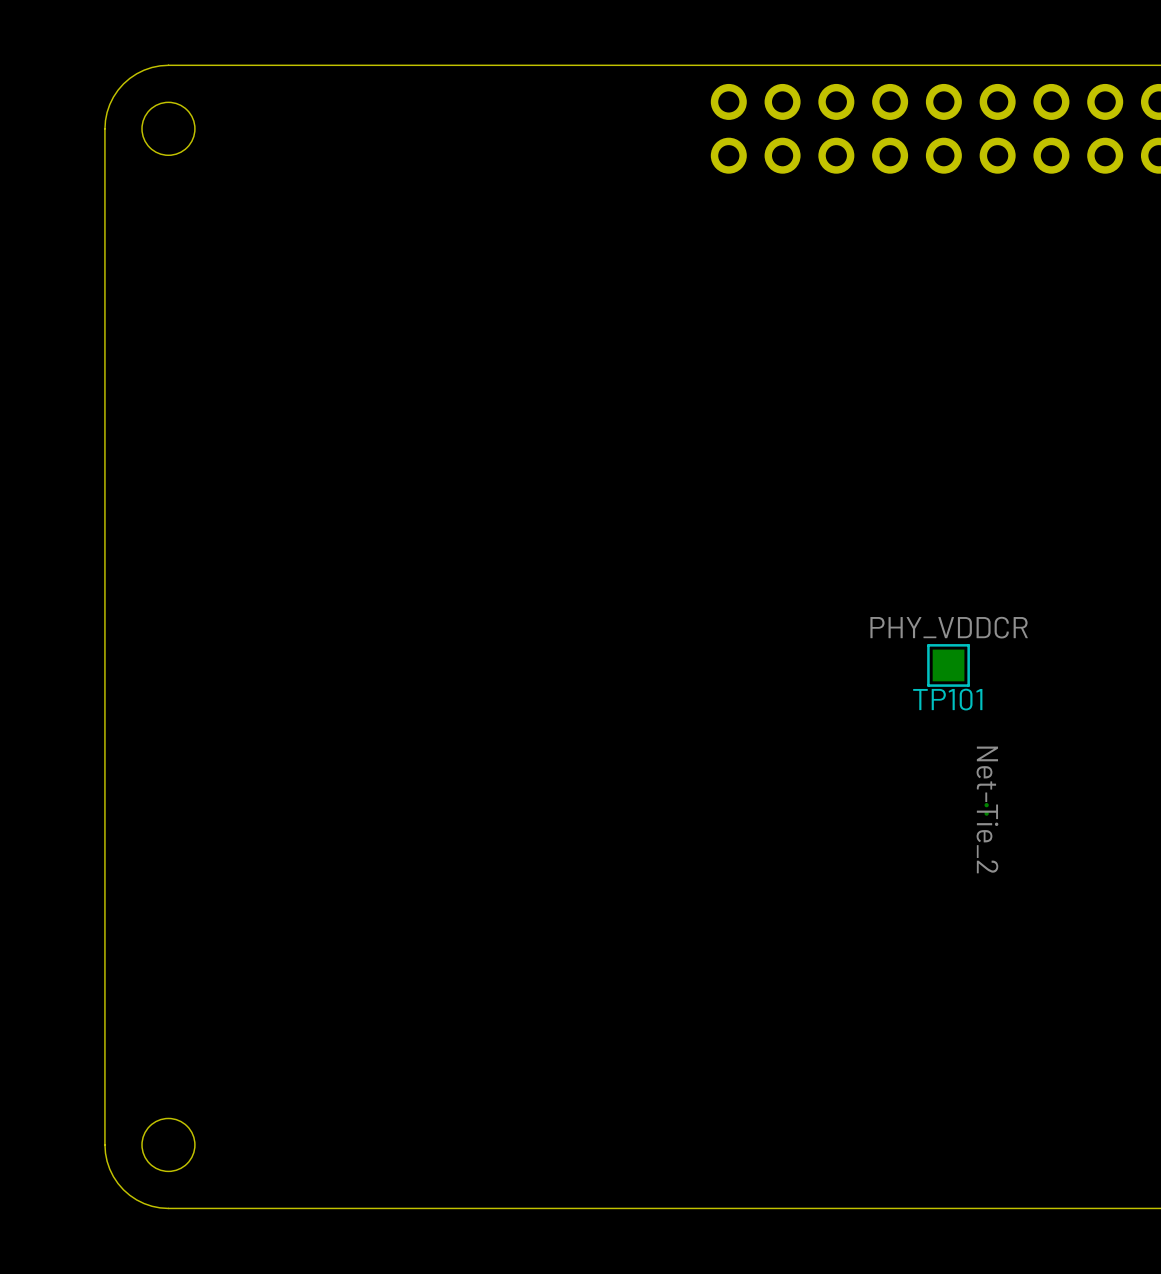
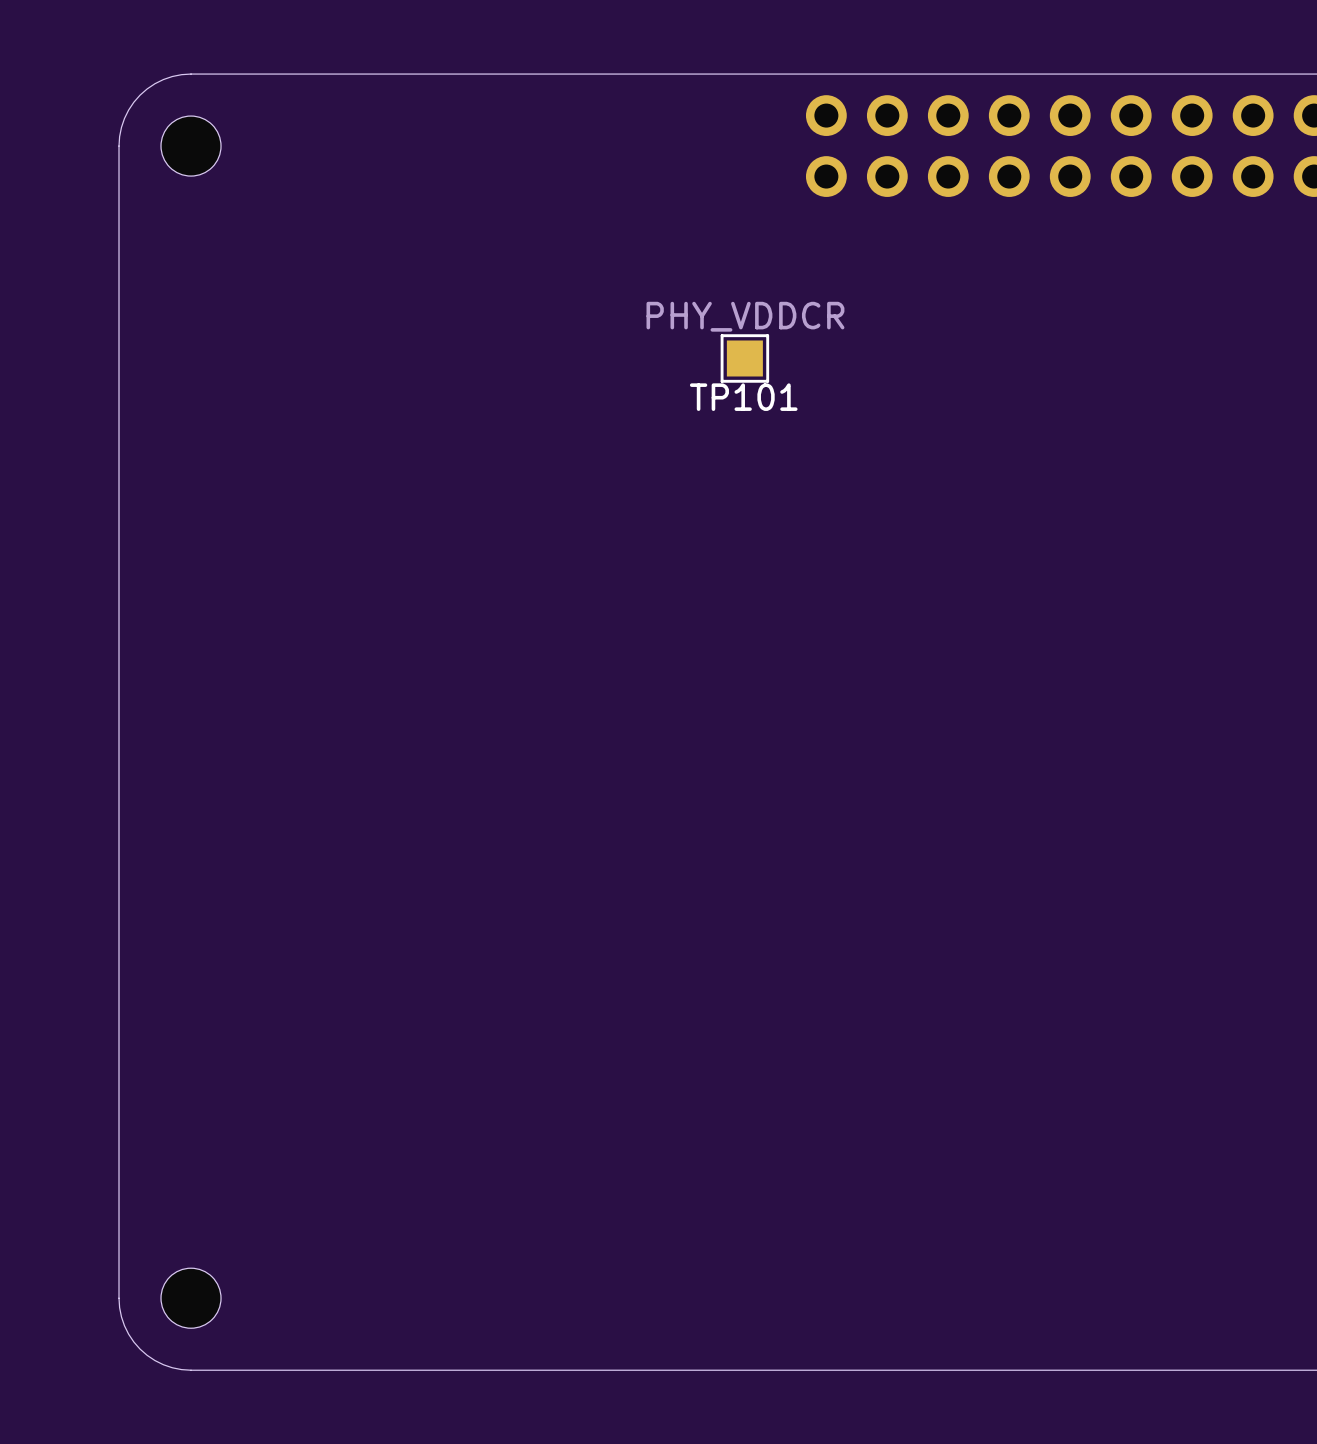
TP101 position: (948, 665) -> (744, 358)
part: Net-Tie_2 (986, 809) -> none

